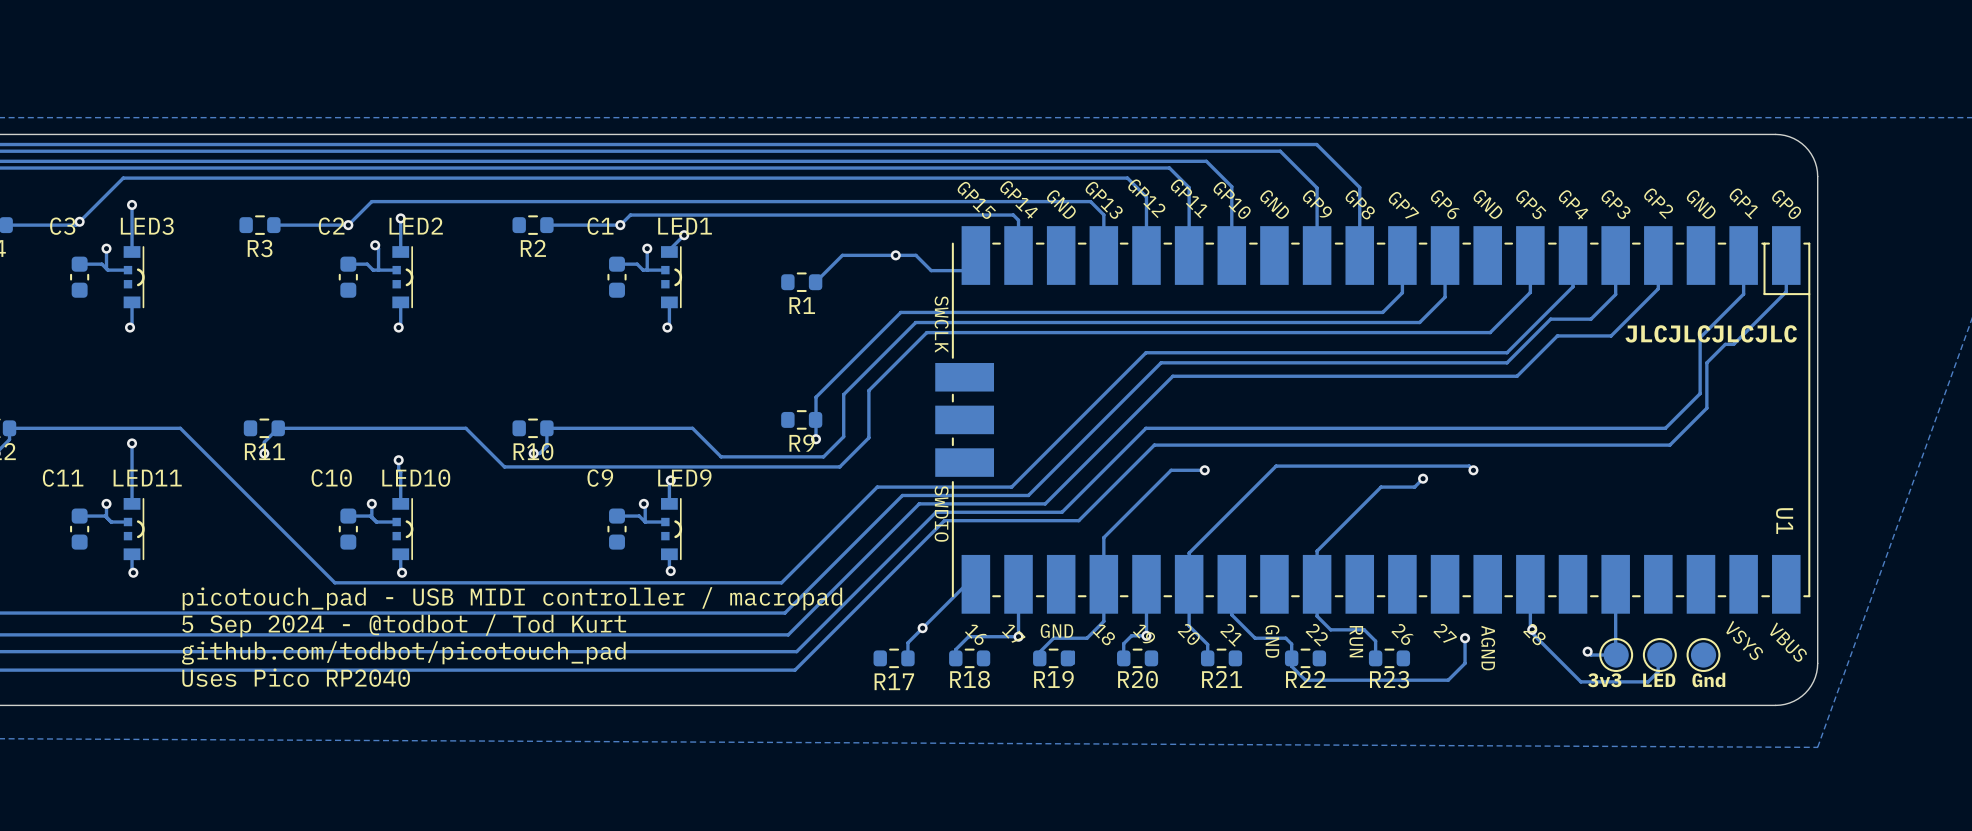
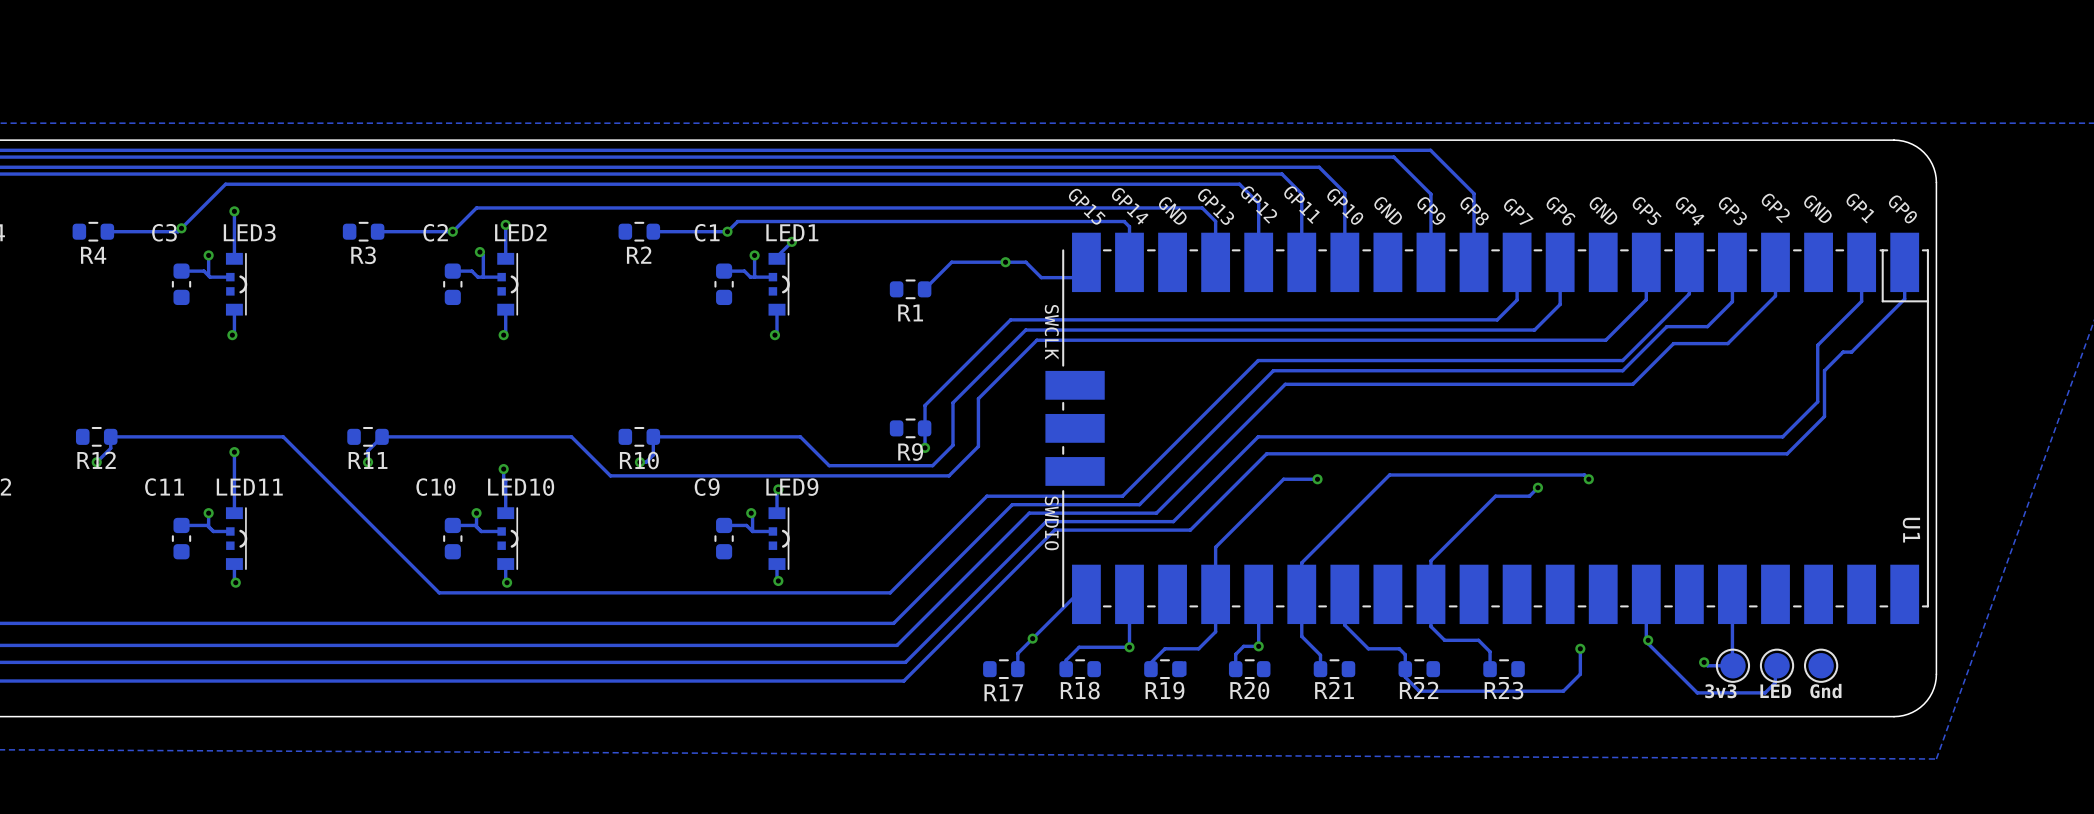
U1 footprint: [935, 226, 1811, 614] -> [1045, 232, 1929, 625]
text: JLCJLCJLCJLC (1711, 333) -> none
text: picotouch_pad - USB MIDI controller / macropad (512, 598) -> none
text: 5 Sep 2024 - @todbot / Tod Kurt (404, 625) -> none
text: github.com/todbot/picotouch_pad (403, 652) -> none
text: Uses Pico RP2040 (296, 677) -> none

